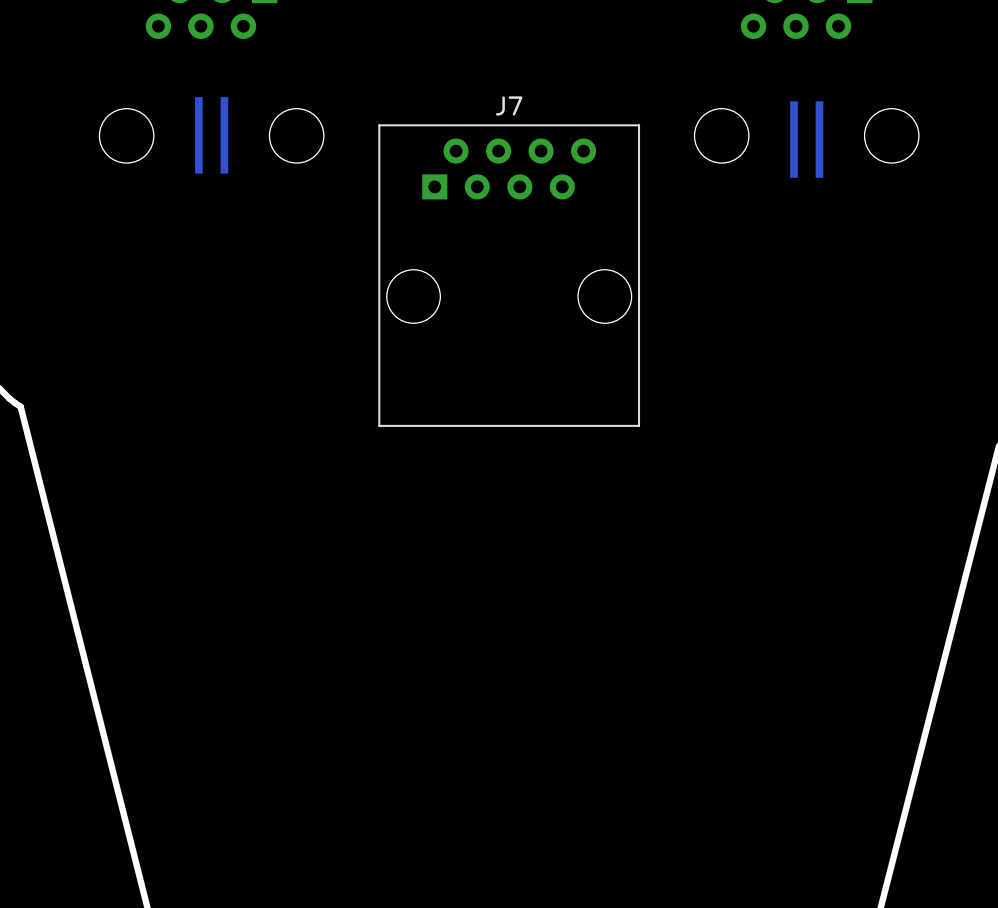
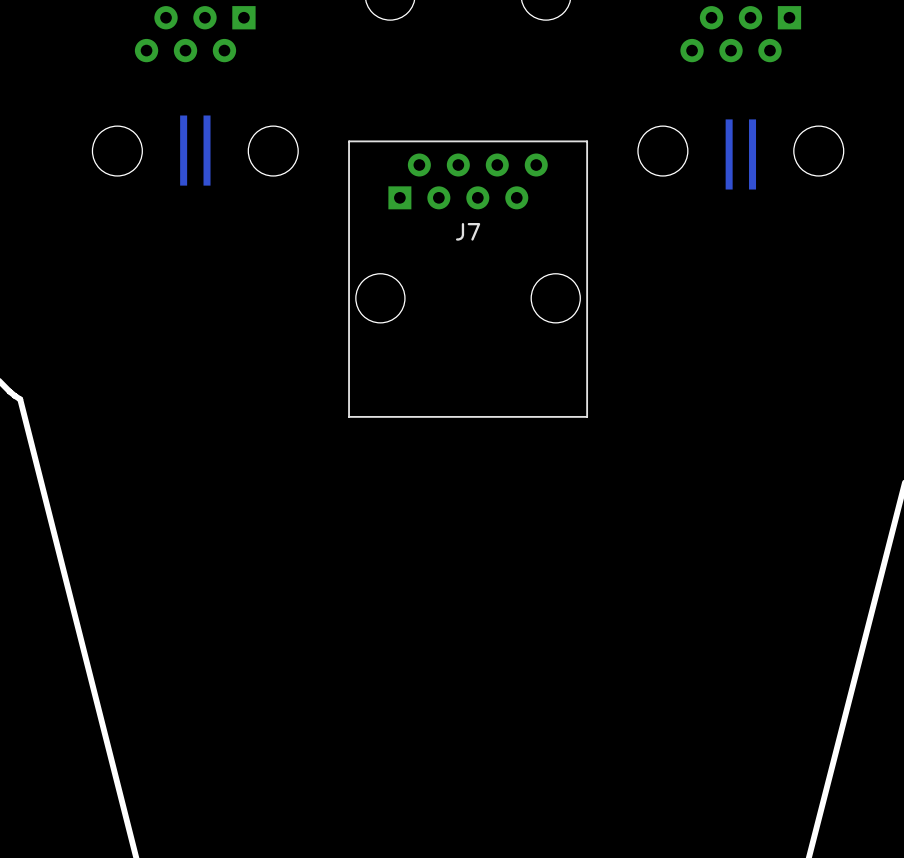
J7 name position: J7 (509, 105) -> J7 (468, 231)

